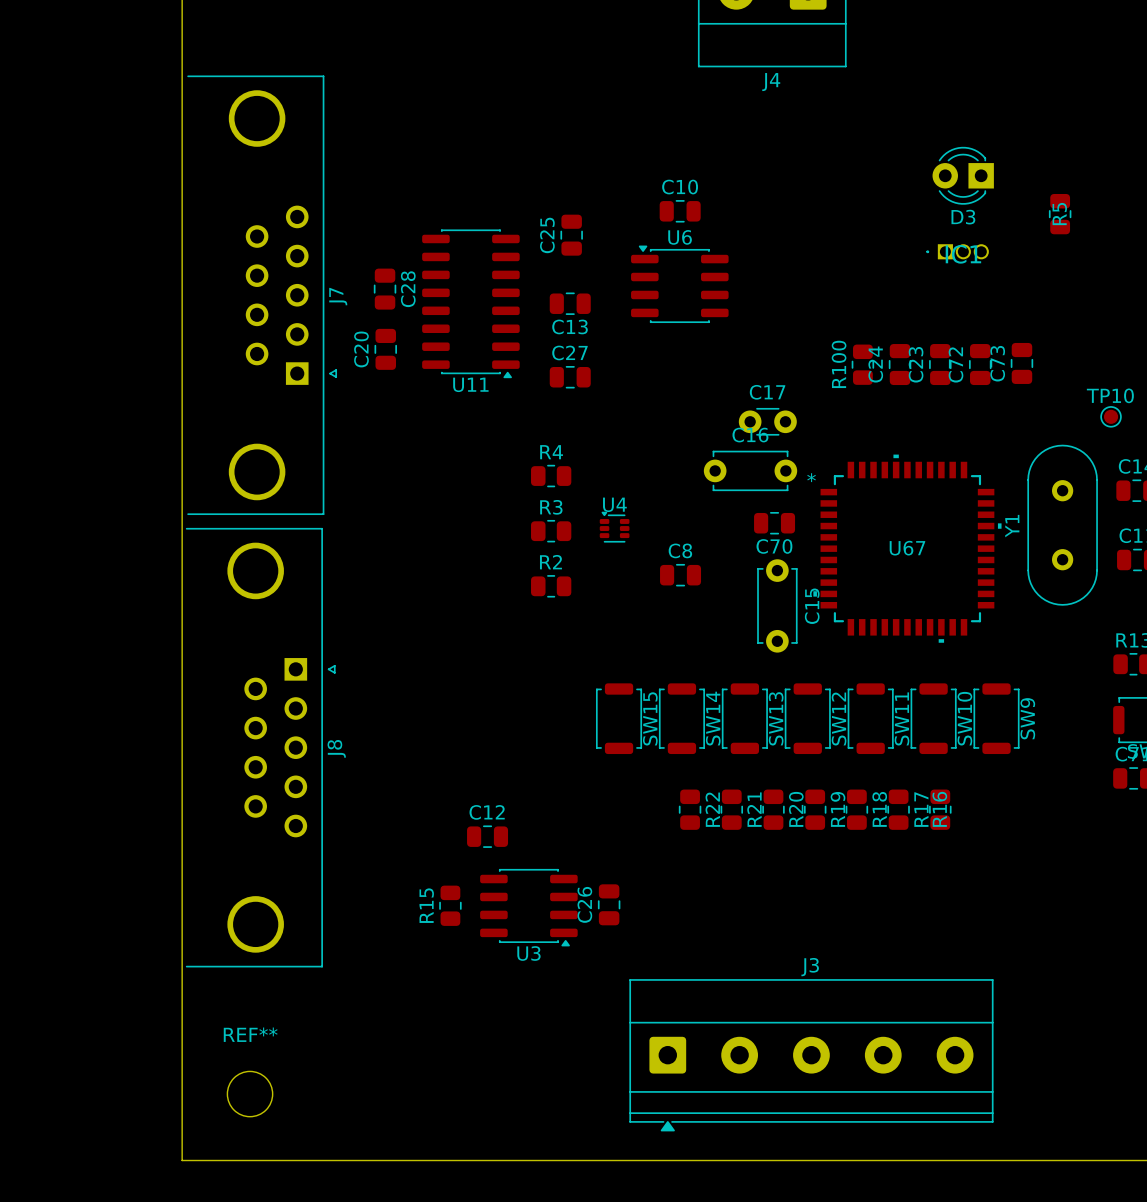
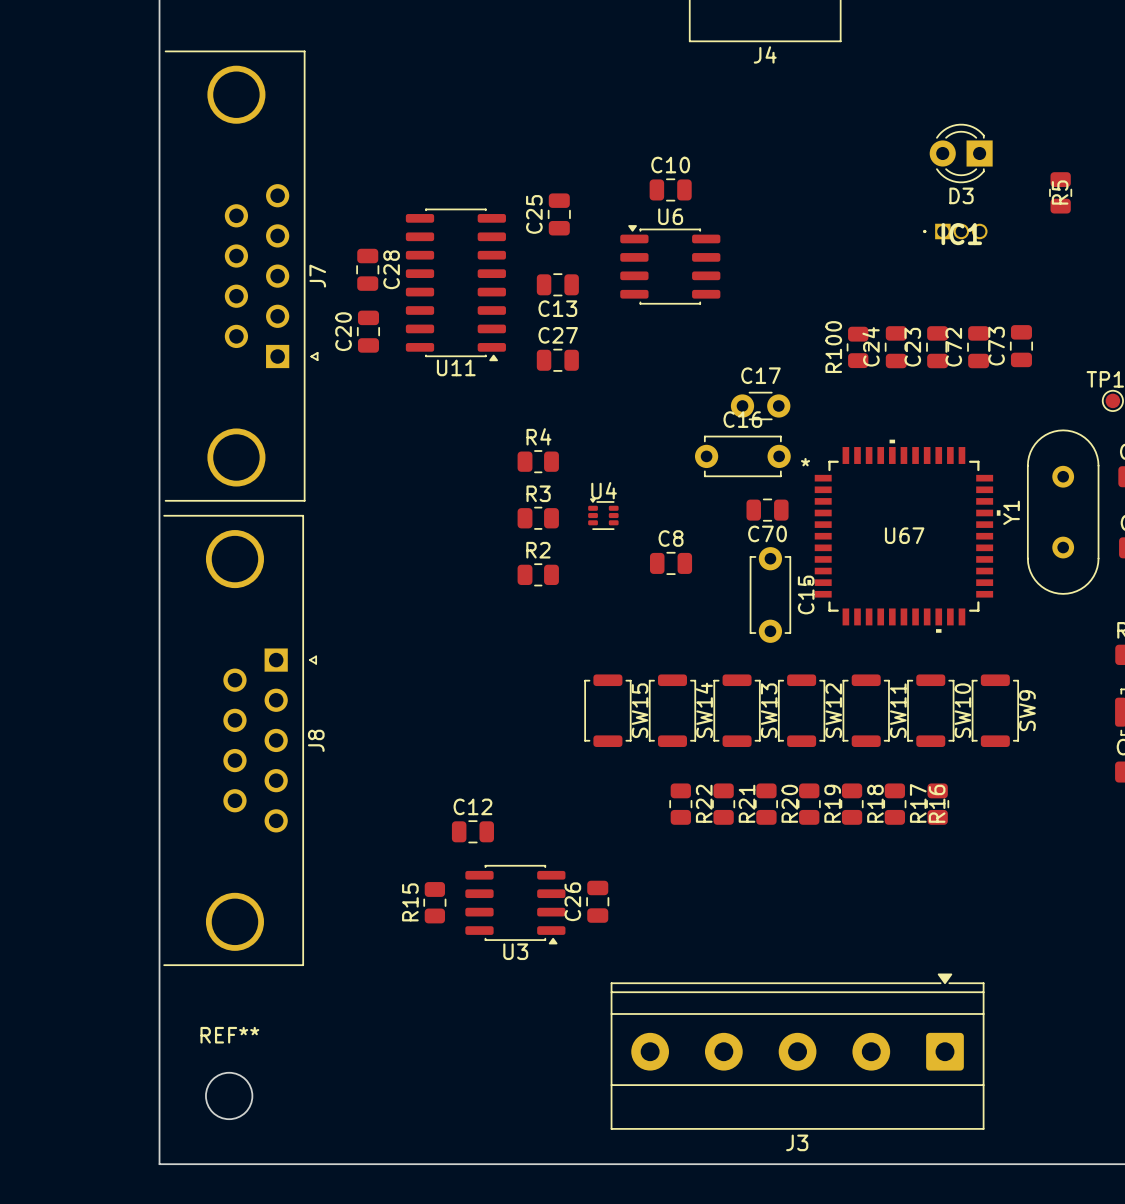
J3 rotation: 0° (811, 1055) -> 180° (797, 1051)

